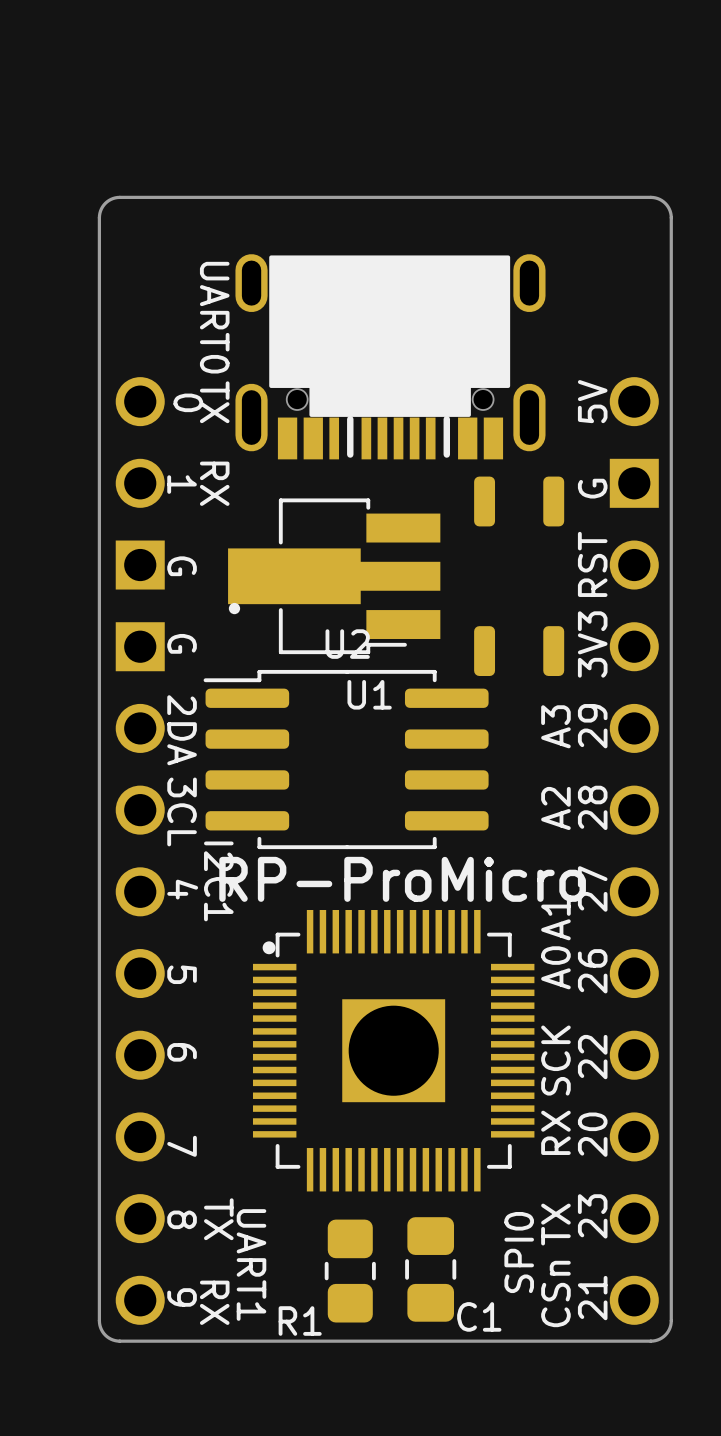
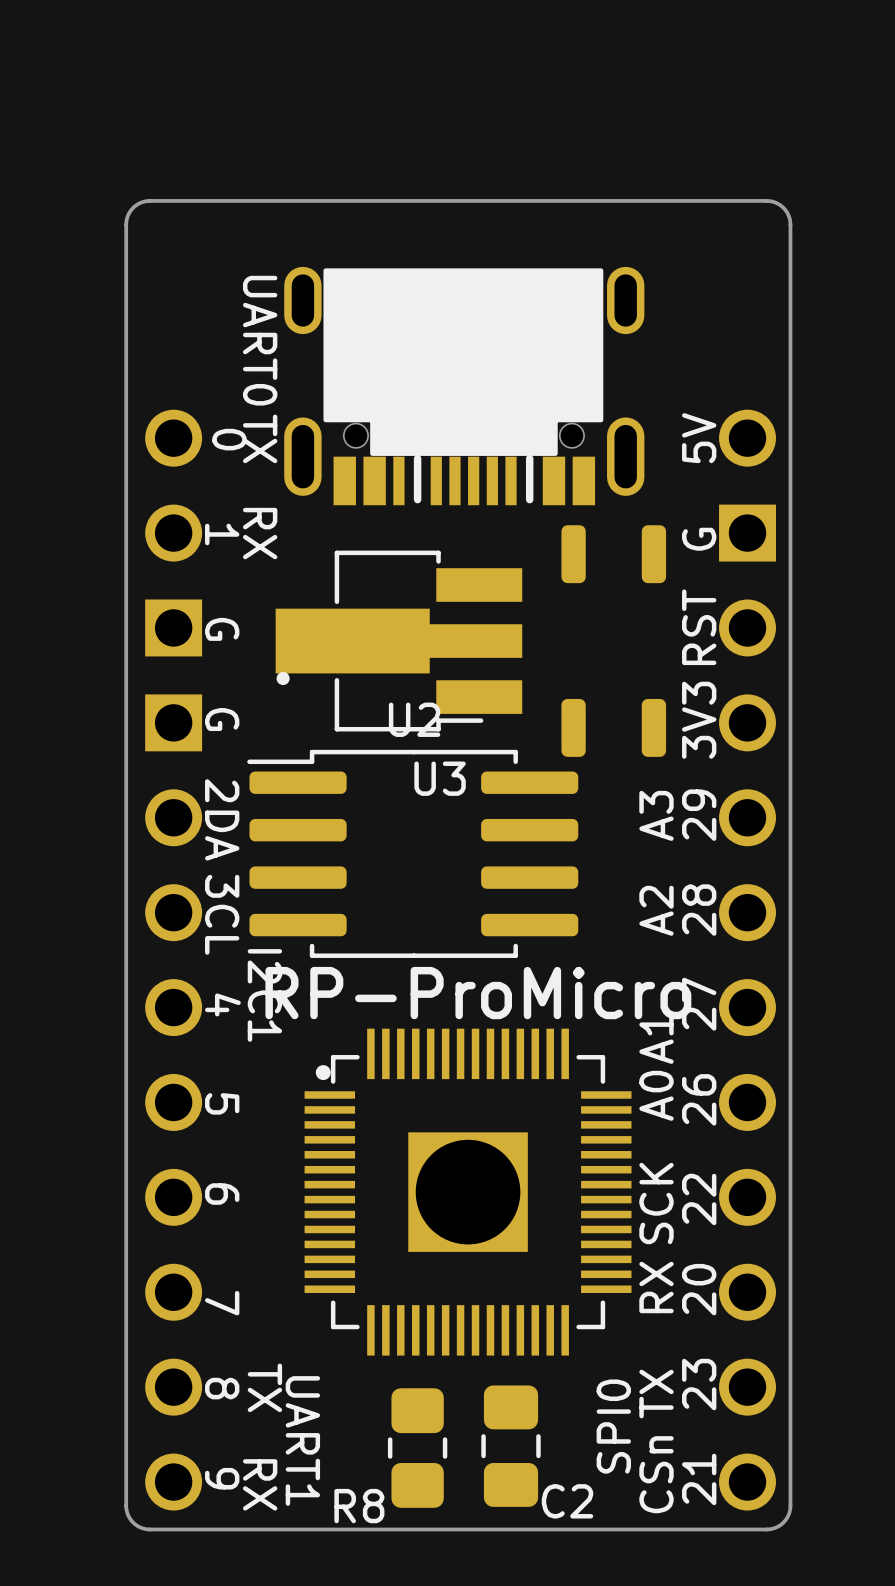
U1 name: U1 (369, 694) -> U3 (440, 778)
C1 name: C1 (479, 1316) -> C2 (567, 1501)
R1 name: R1 (300, 1321) -> R8 (359, 1506)

